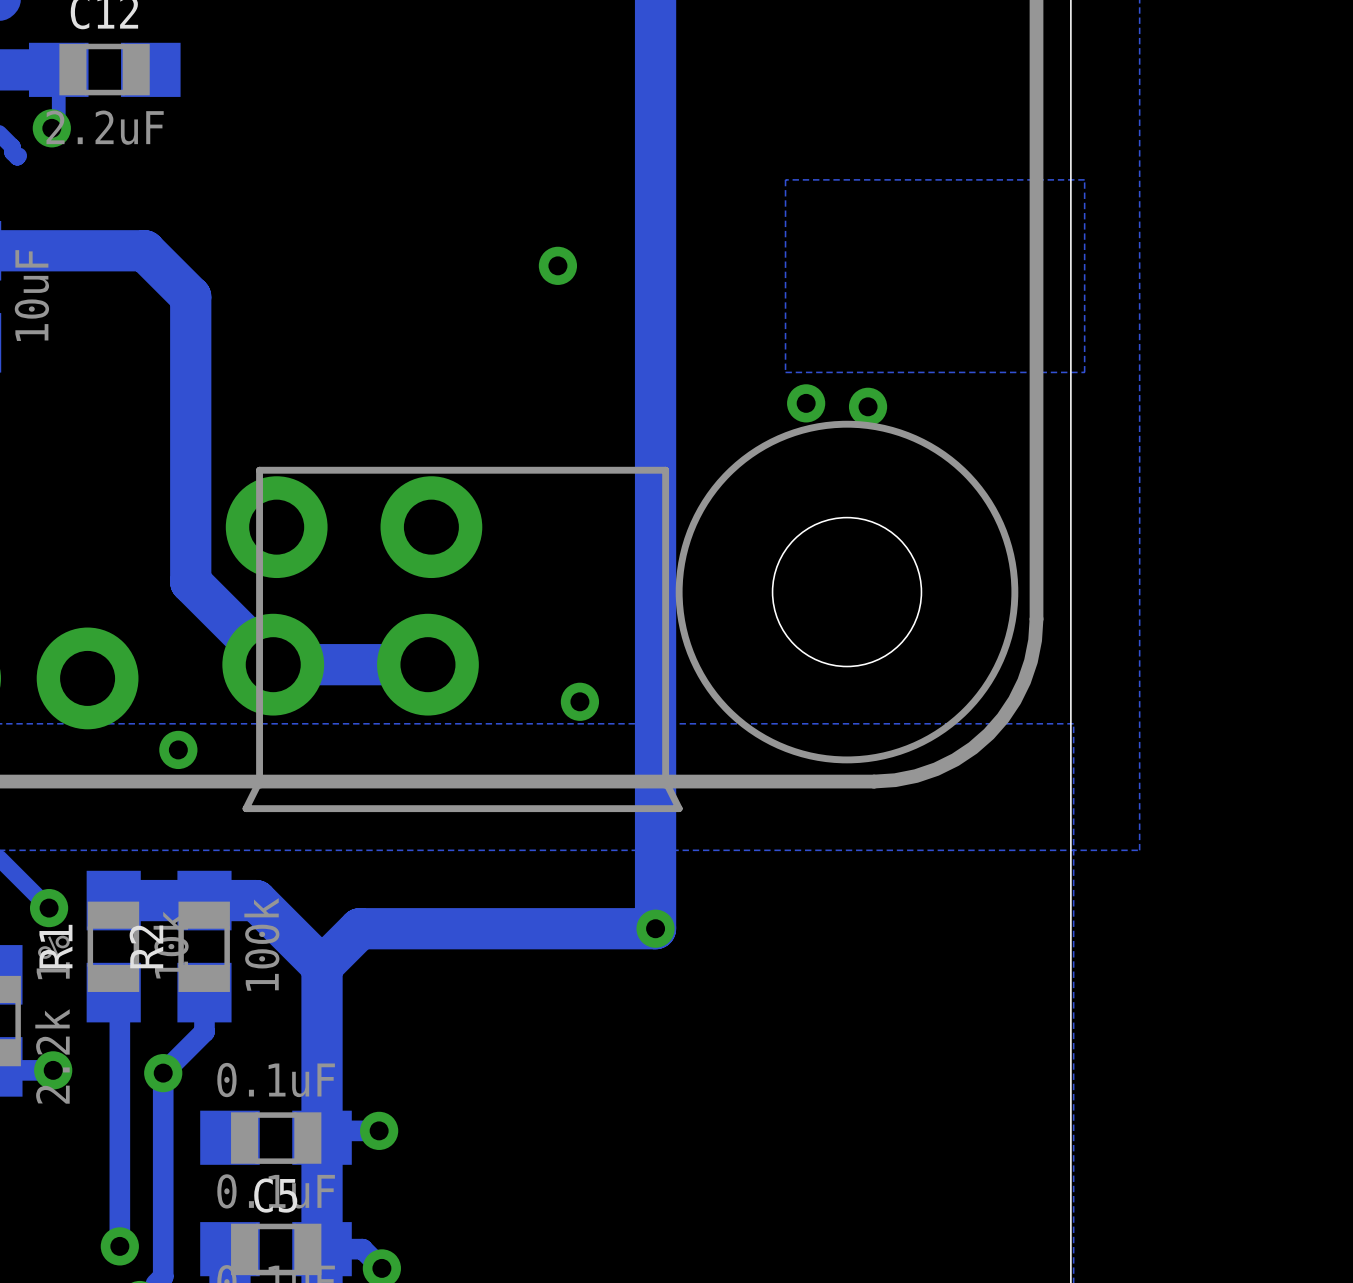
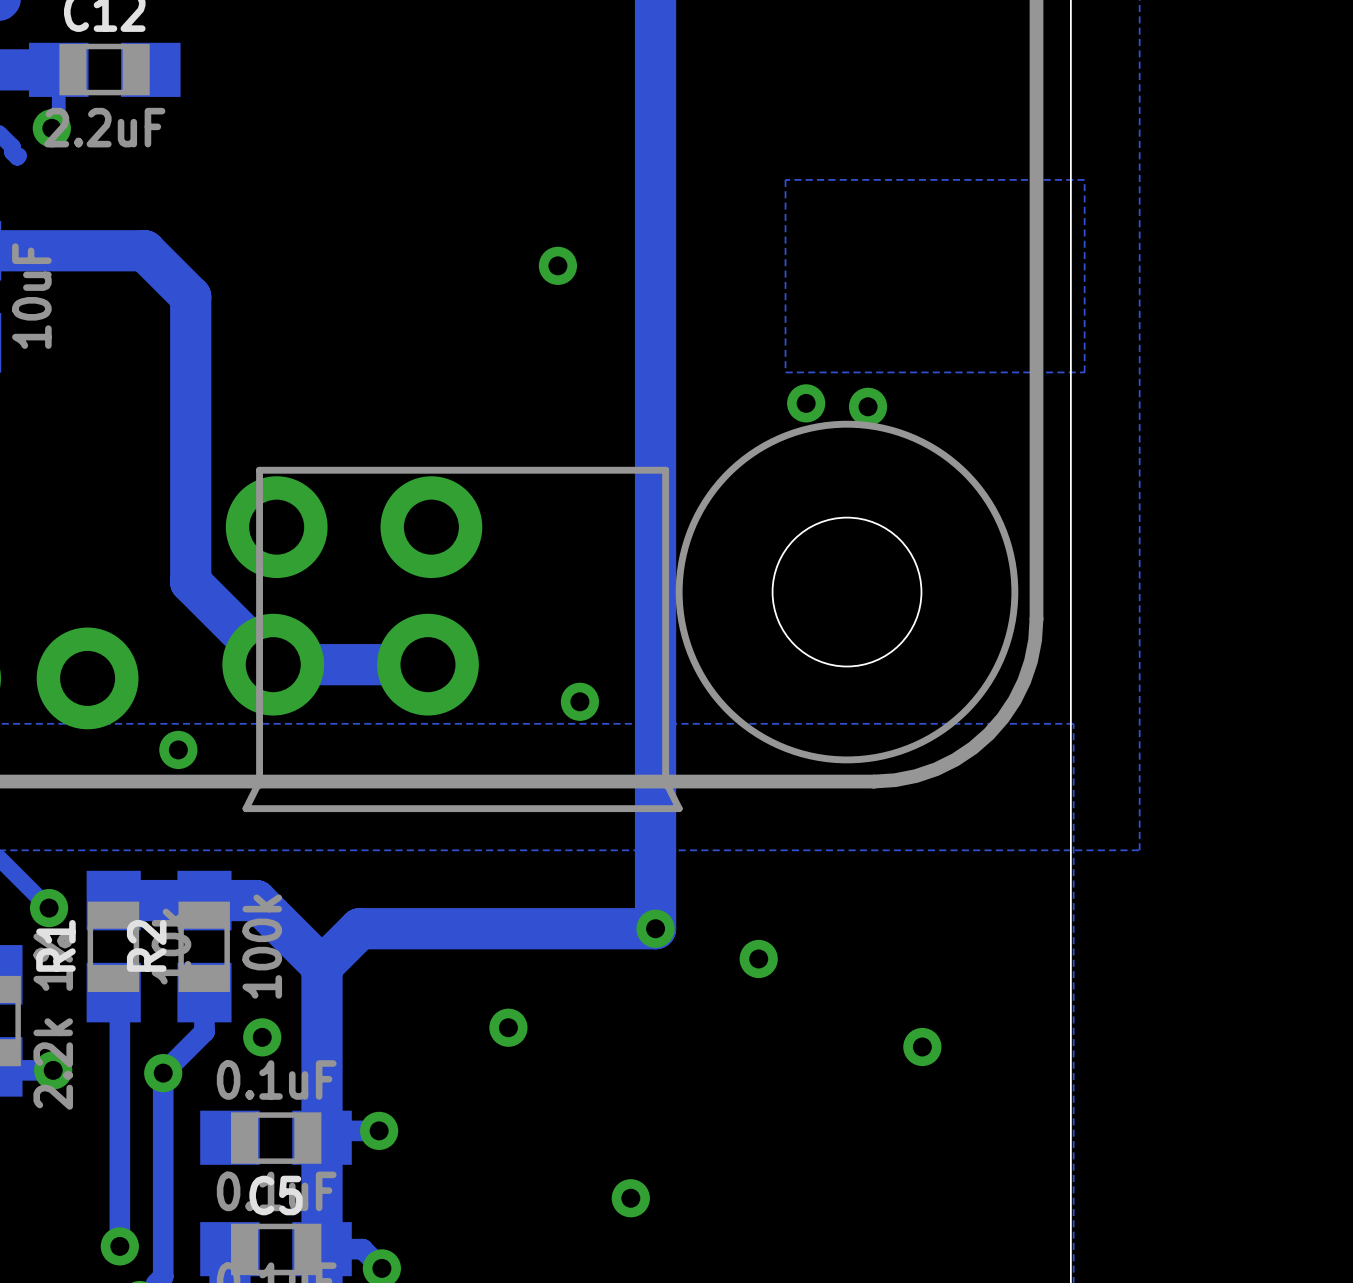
via: none -> (758, 958)
via: none -> (508, 1027)
via: none -> (262, 1037)
via: none -> (922, 1046)
via: none -> (630, 1198)

